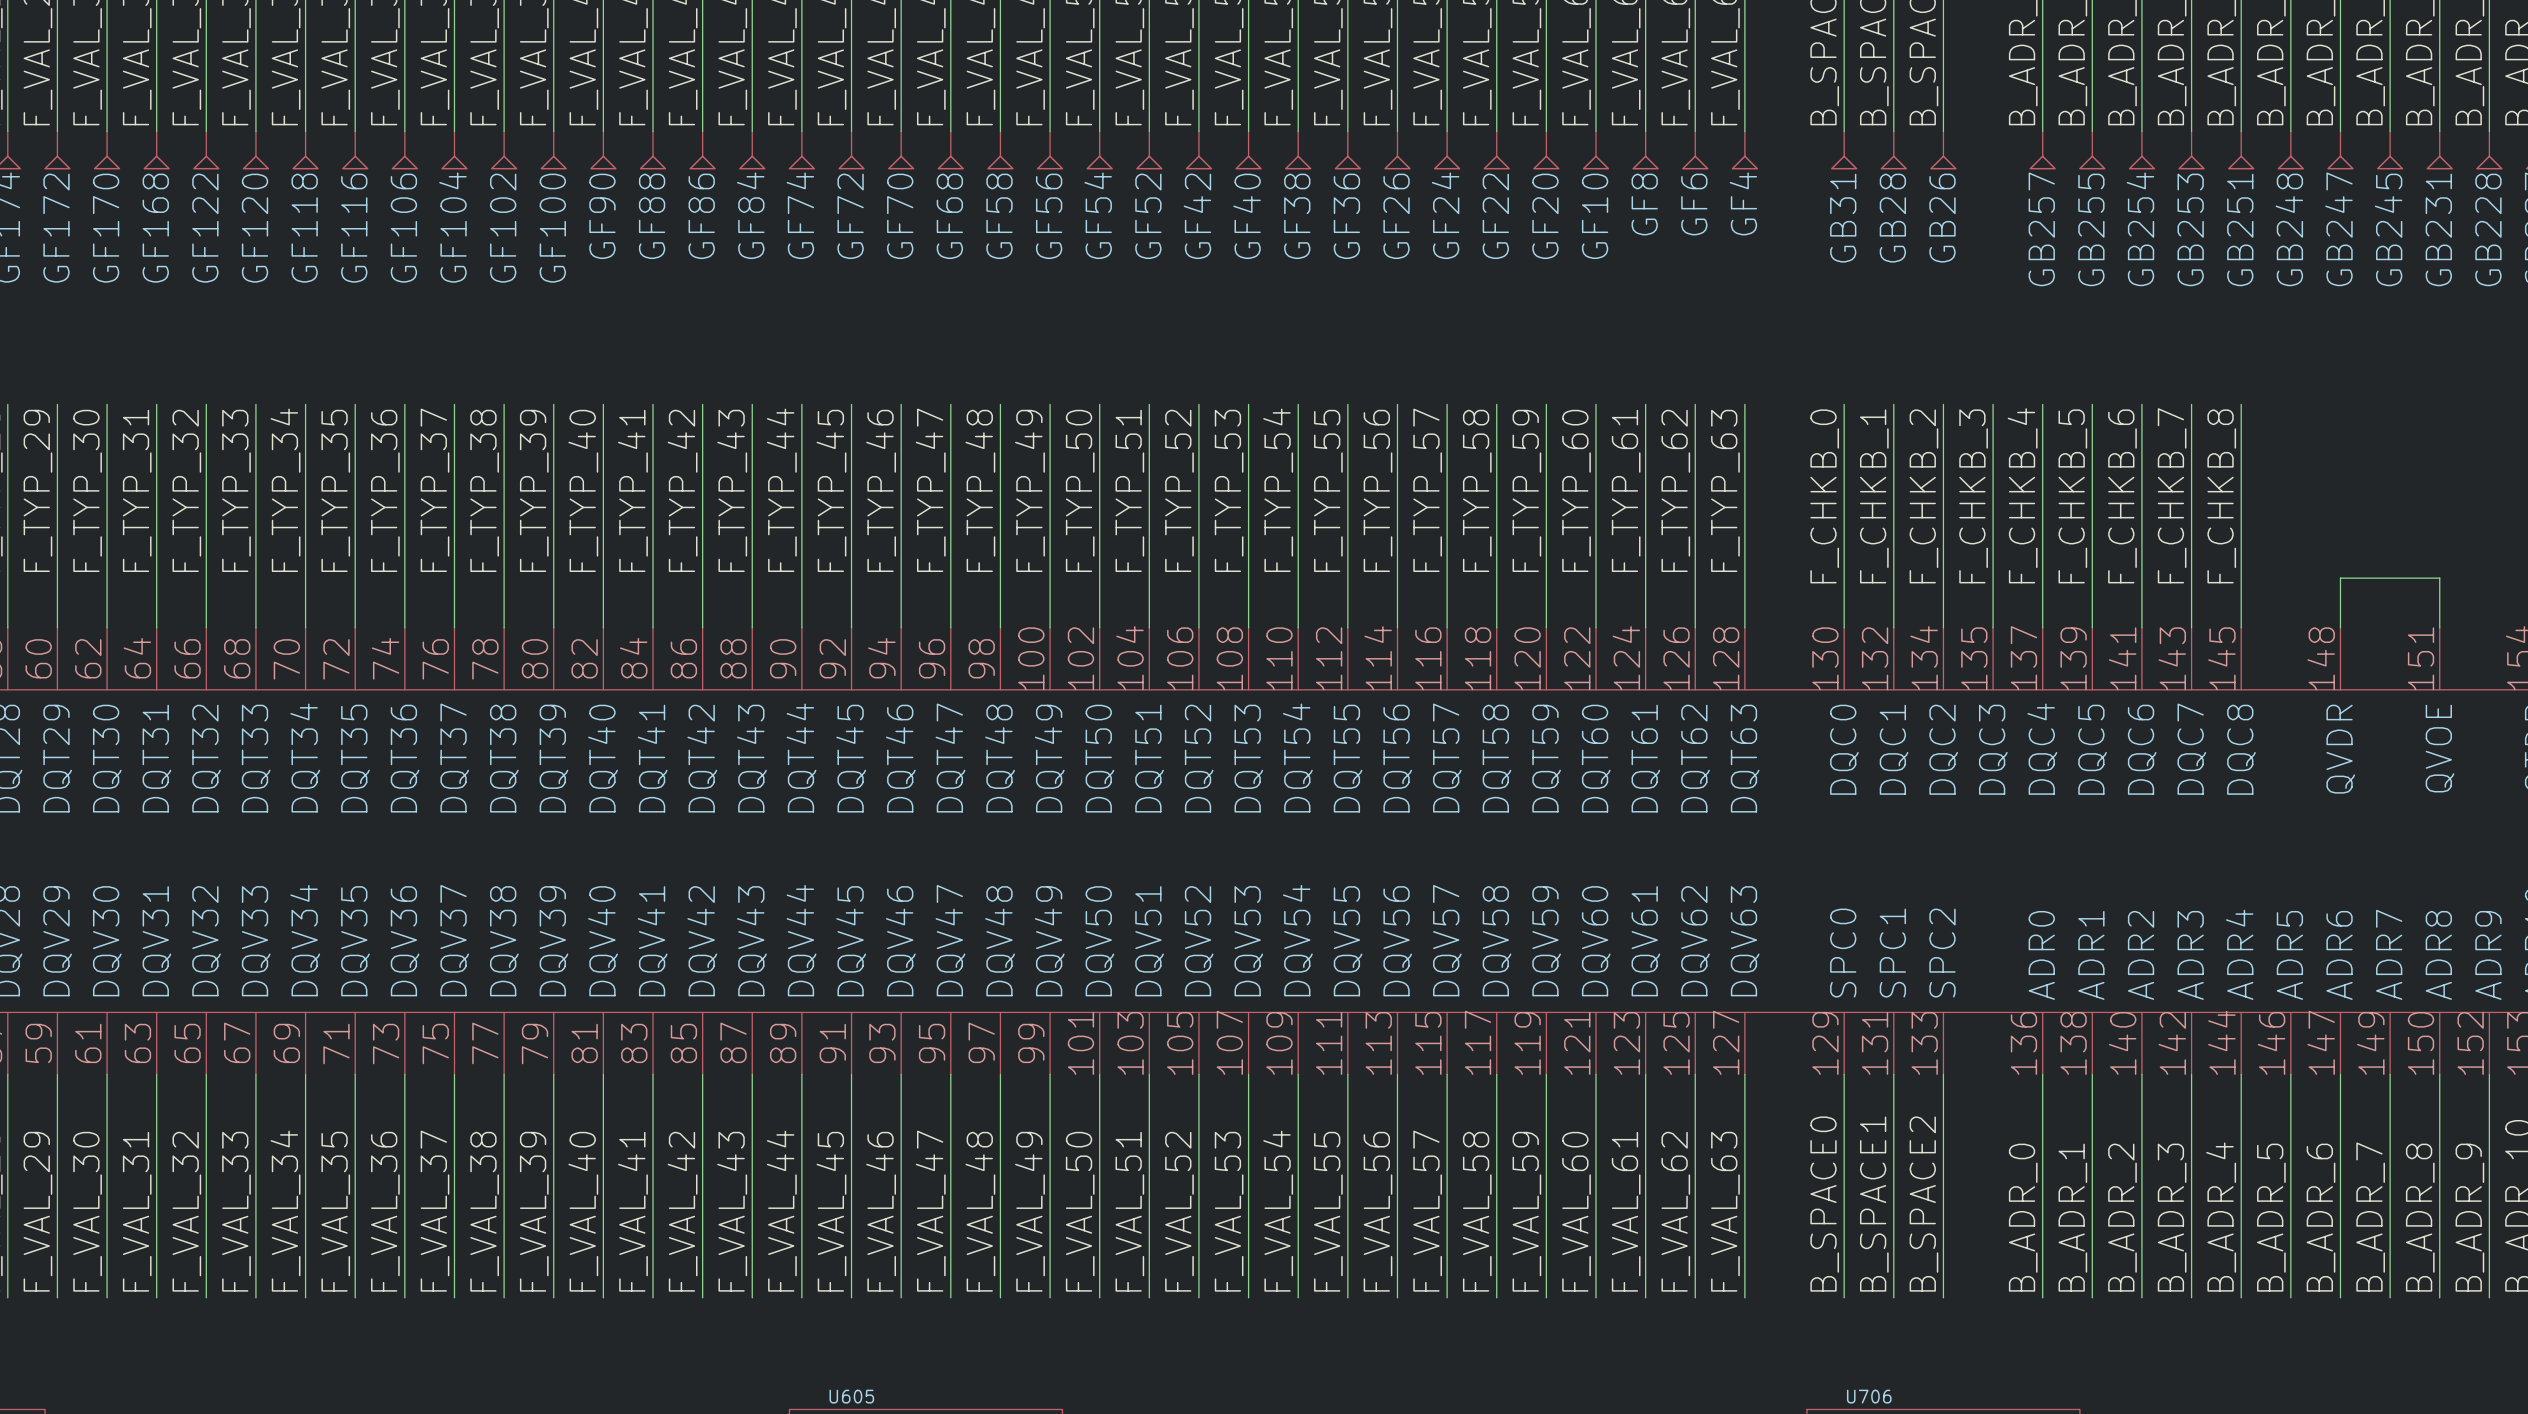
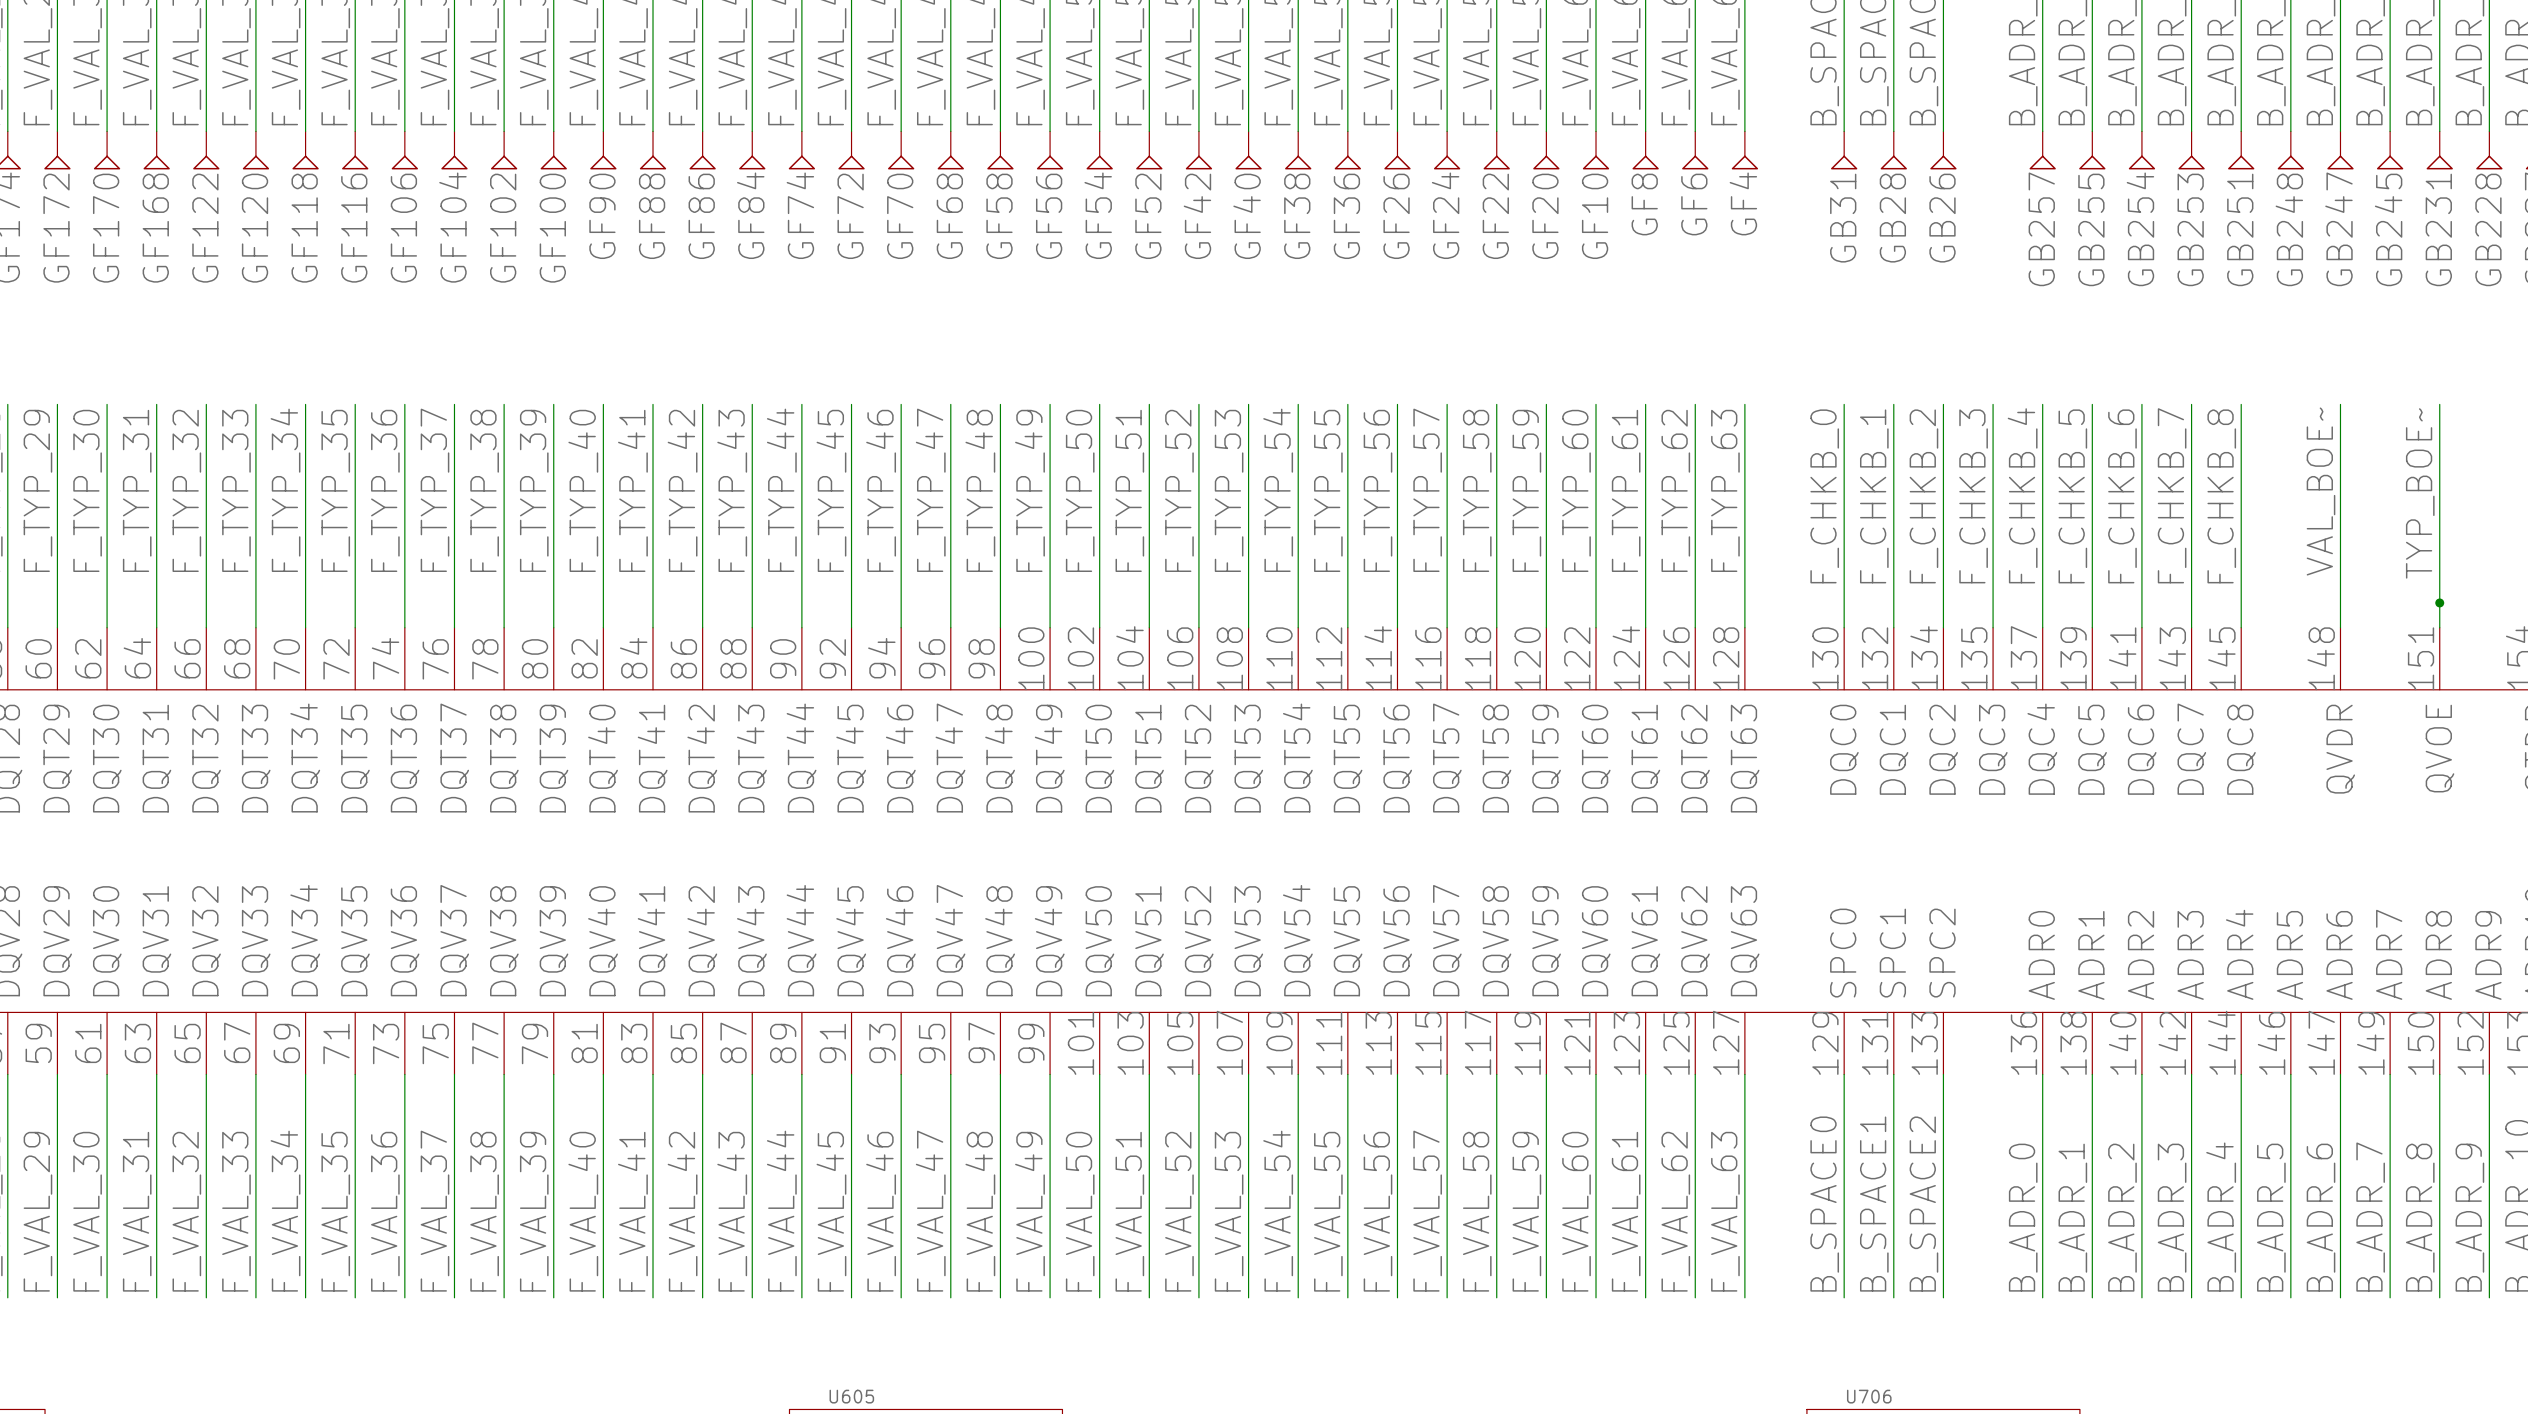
wire: none -> (2439, 404) (2439, 578)
label: none -> VAL_BOE~ (2321, 491)
label: none -> TYP_BOE~ (2420, 493)
wire: (2340, 578) (2439, 578) -> (2340, 578) (2340, 404)
junction: none -> (2439, 602)

